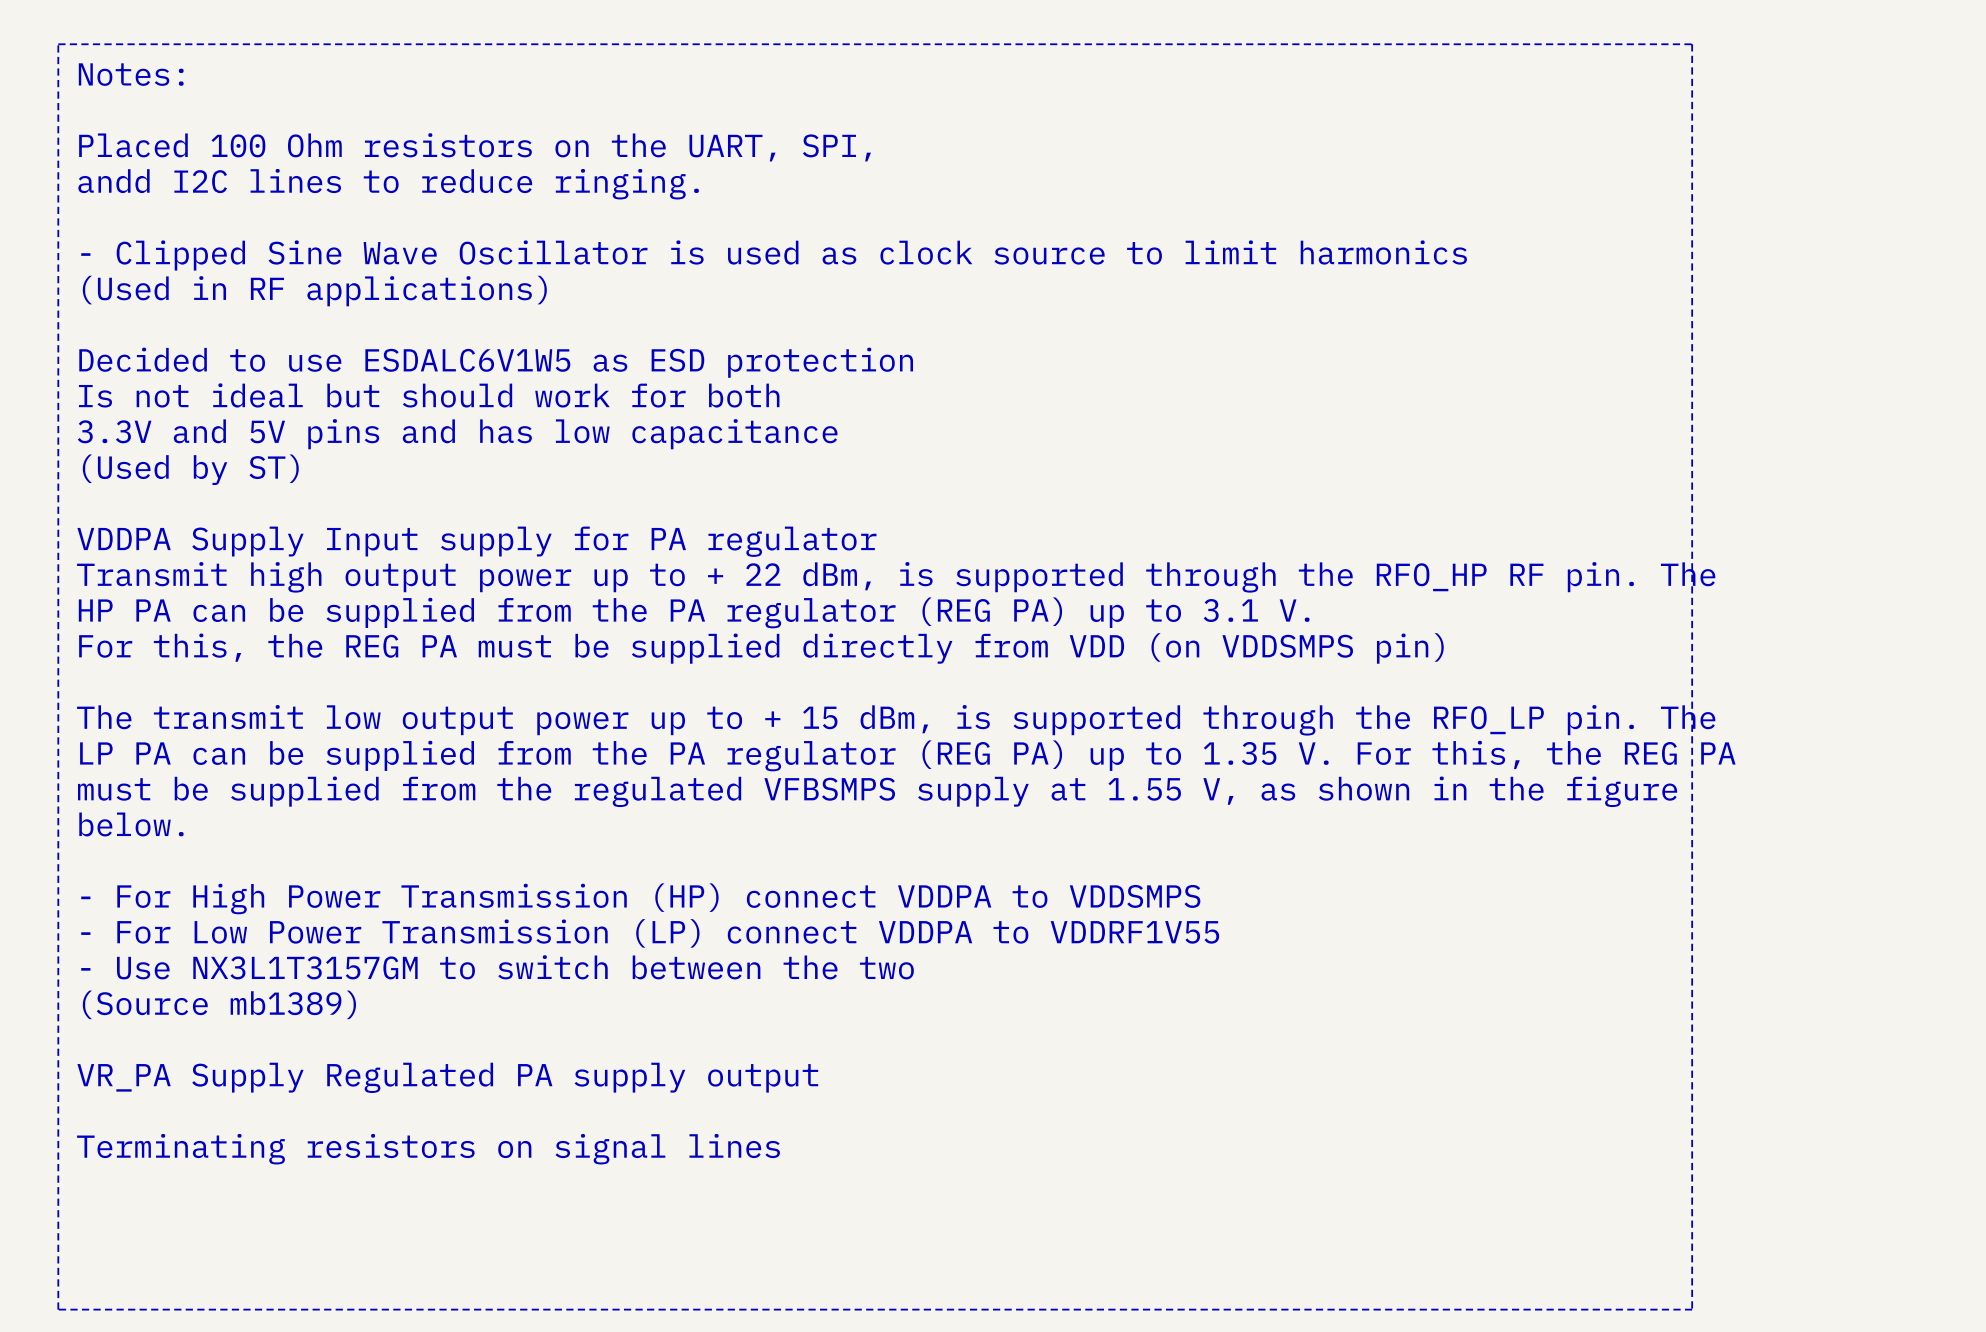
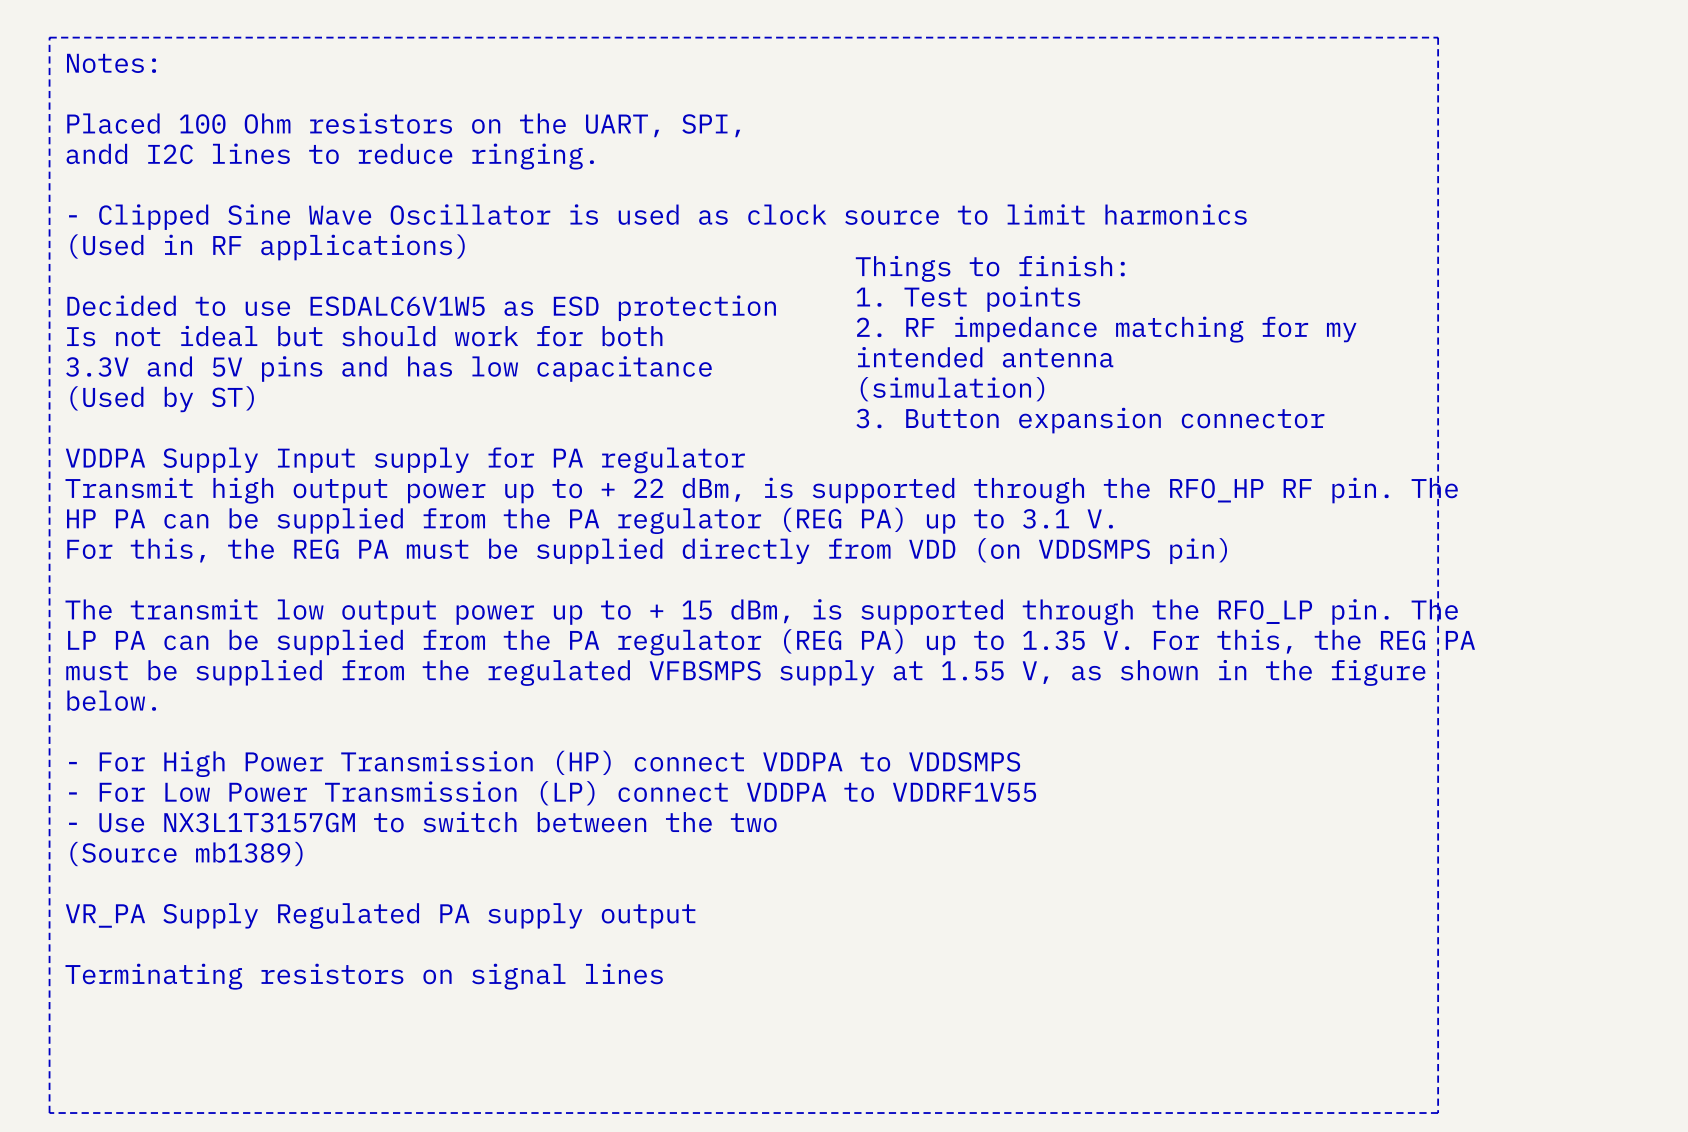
text: none -> Things to finish: (990, 268)
text: none -> 1. Test points (968, 299)
text: none -> 2. RF impedance matching for my (1106, 329)
text: none -> intended antenna (985, 357)
text: none -> (simulation) (952, 389)
text: none -> 3. Button expansion connector (1090, 420)

